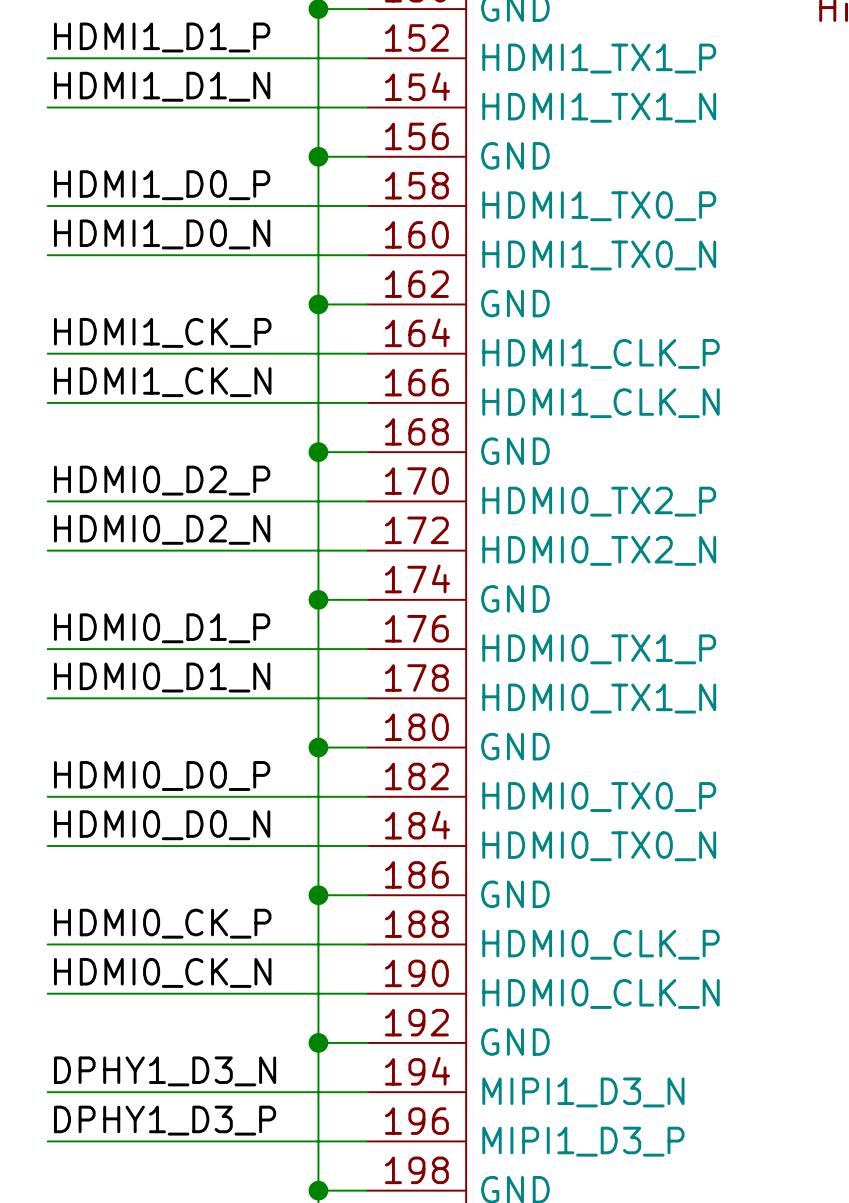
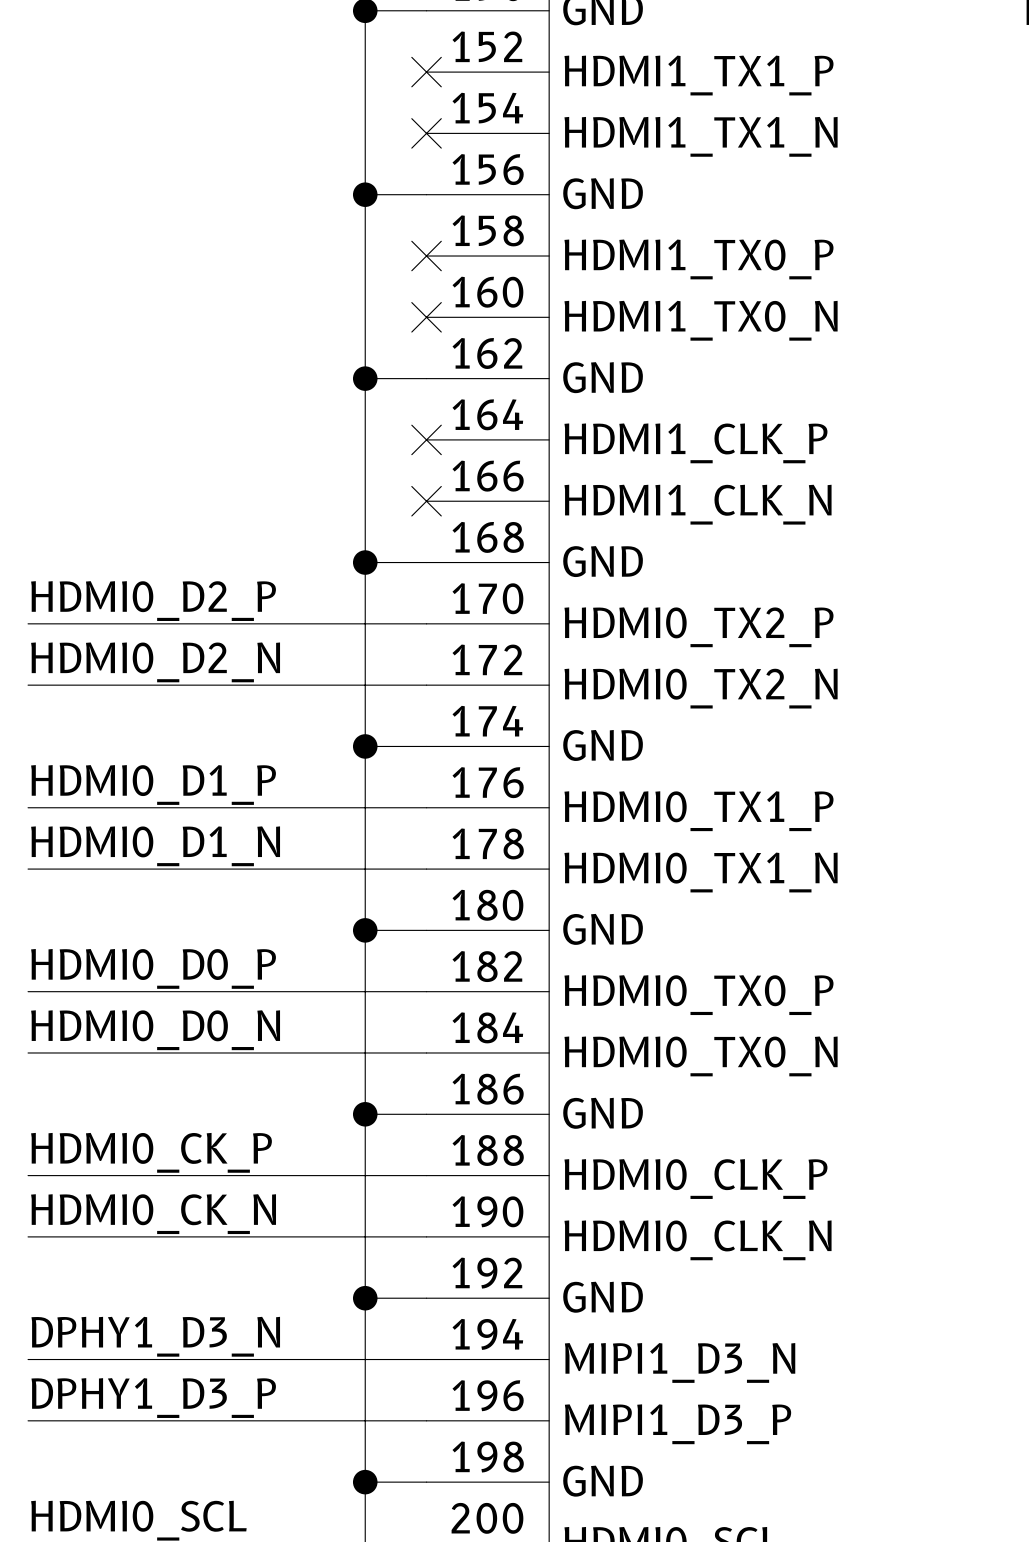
label: HDMI1_D1_P (162, 37) -> none
wire: (47, 58) (367, 58) -> none
no-connect mark: none -> (426, 72)
label: HDMI1_D1_N (162, 86) -> none
wire: (47, 107) (367, 107) -> none
no-connect mark: none -> (426, 133)
label: HDMI1_D0_P (162, 185) -> none
wire: (47, 205) (367, 205) -> none
no-connect mark: none -> (426, 256)
label: HDMI1_D0_N (162, 234) -> none
wire: (47, 255) (367, 255) -> none
no-connect mark: none -> (426, 317)
label: HDMI1_CK_P (162, 332) -> none
wire: (47, 353) (367, 353) -> none
no-connect mark: none -> (426, 439)
label: HDMI1_CK_N (162, 382) -> none
wire: (47, 402) (367, 402) -> none
no-connect mark: none -> (426, 501)

